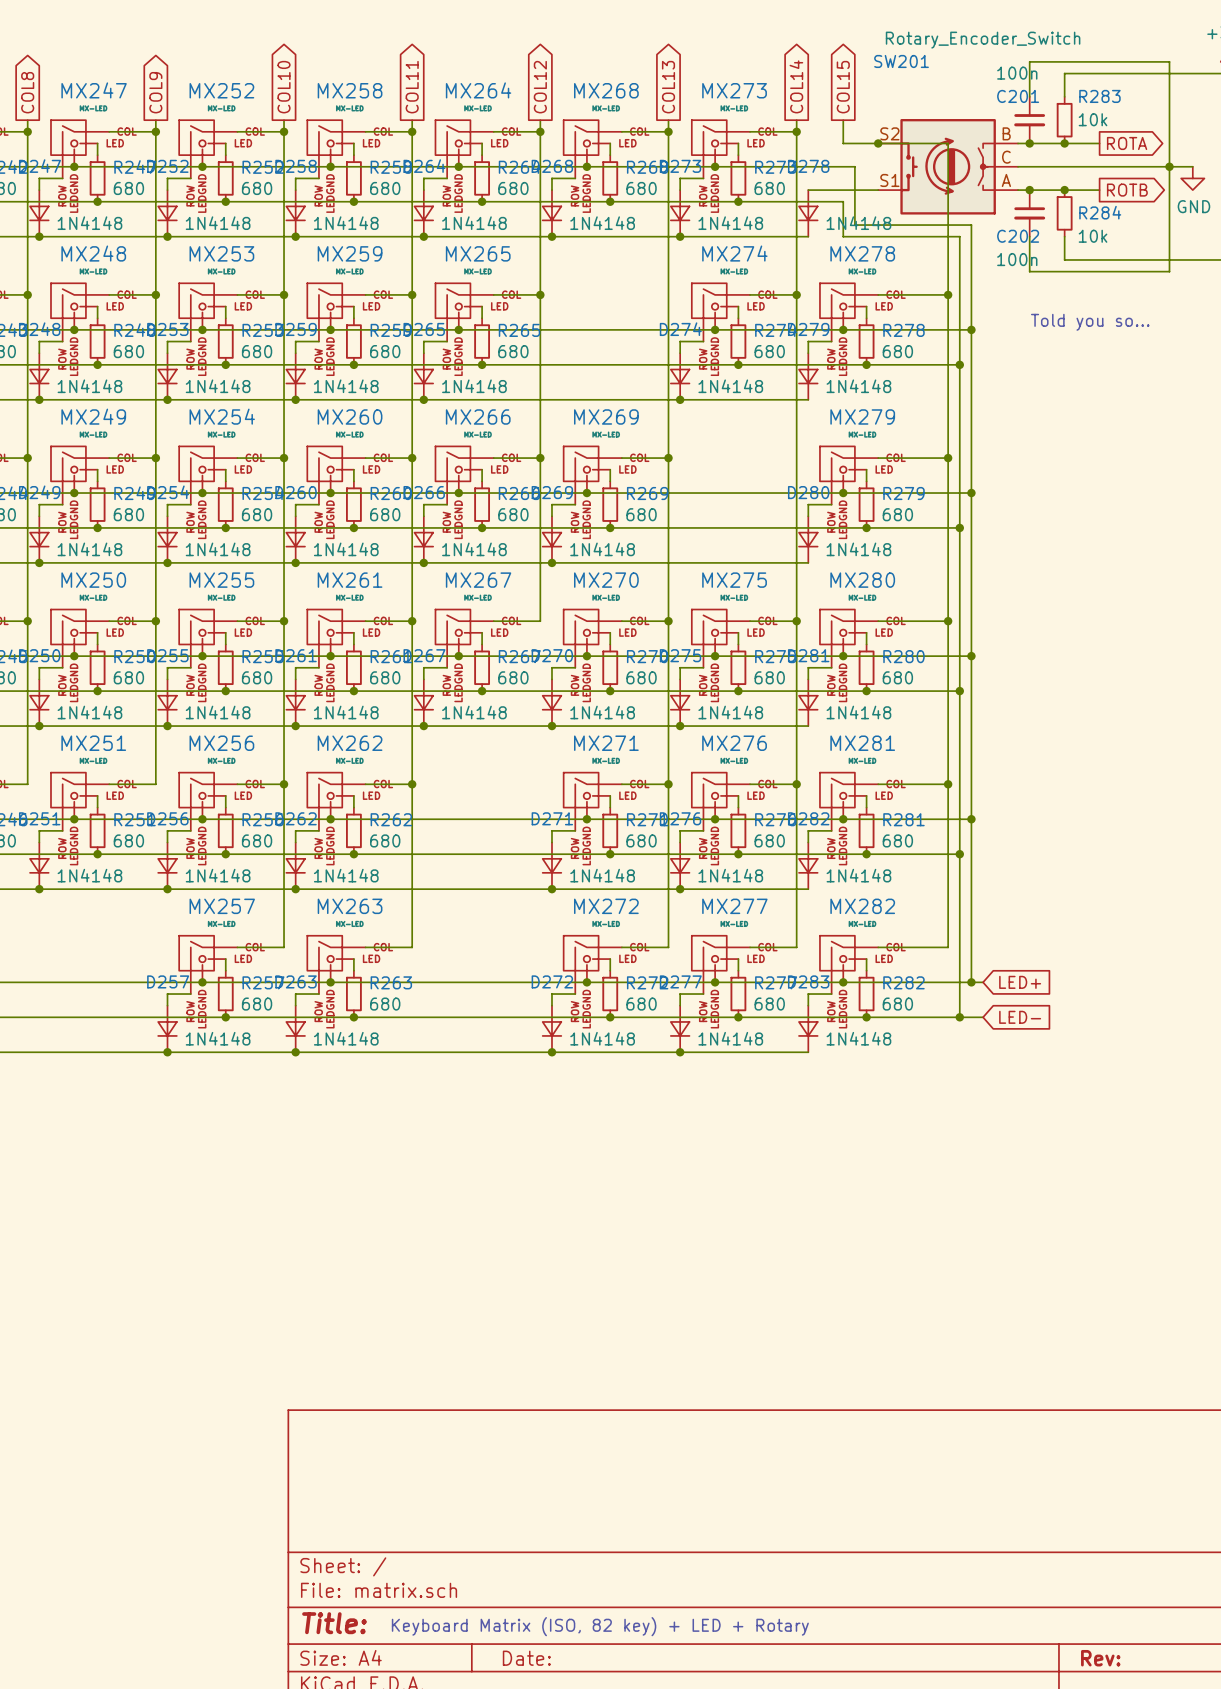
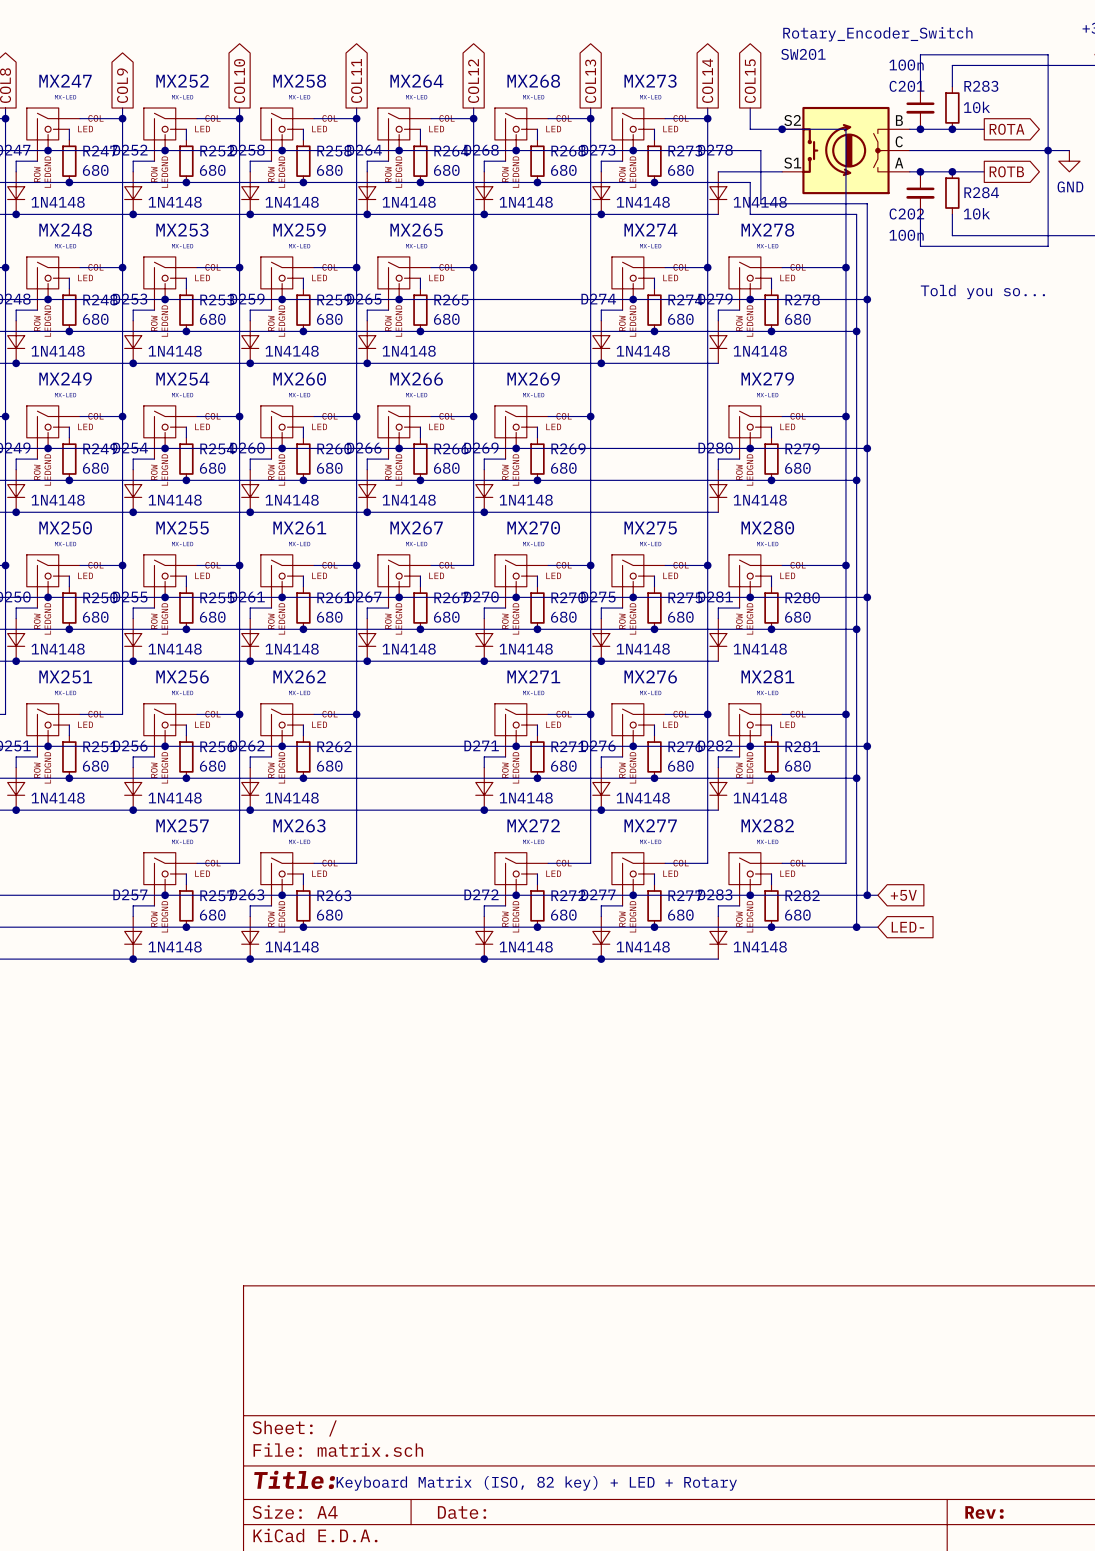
global label: LED+ (1020, 982) -> +5V (903, 895)

